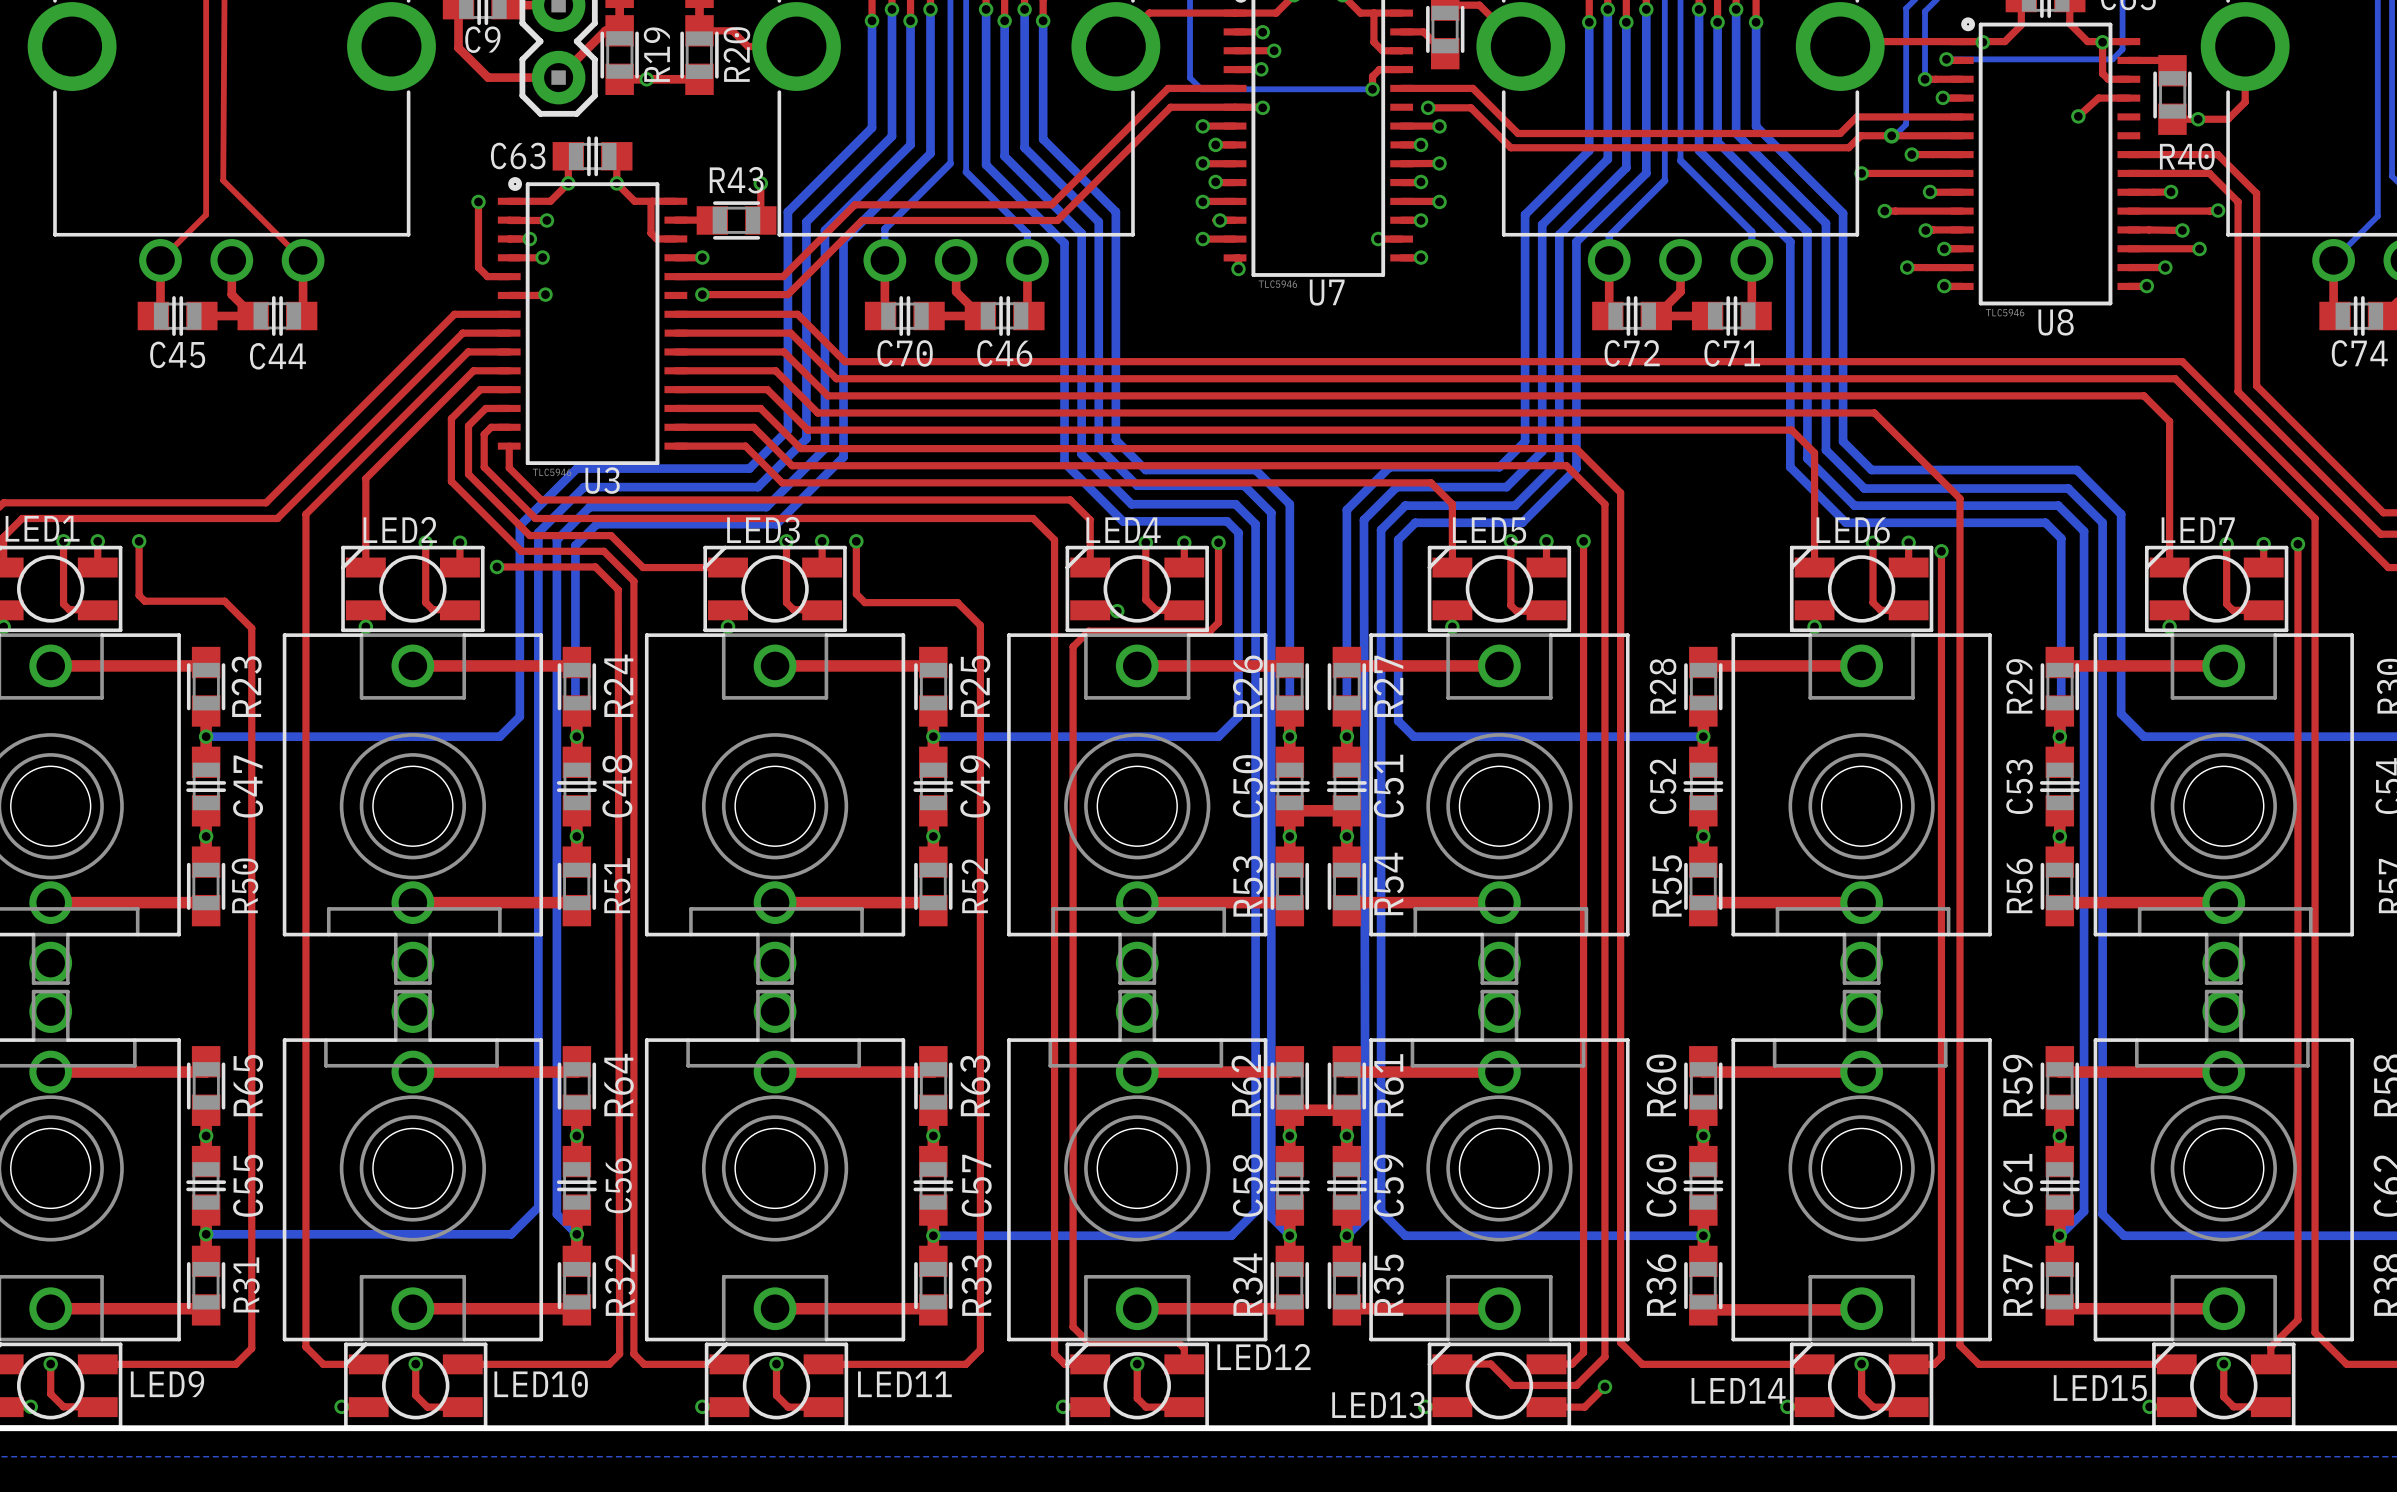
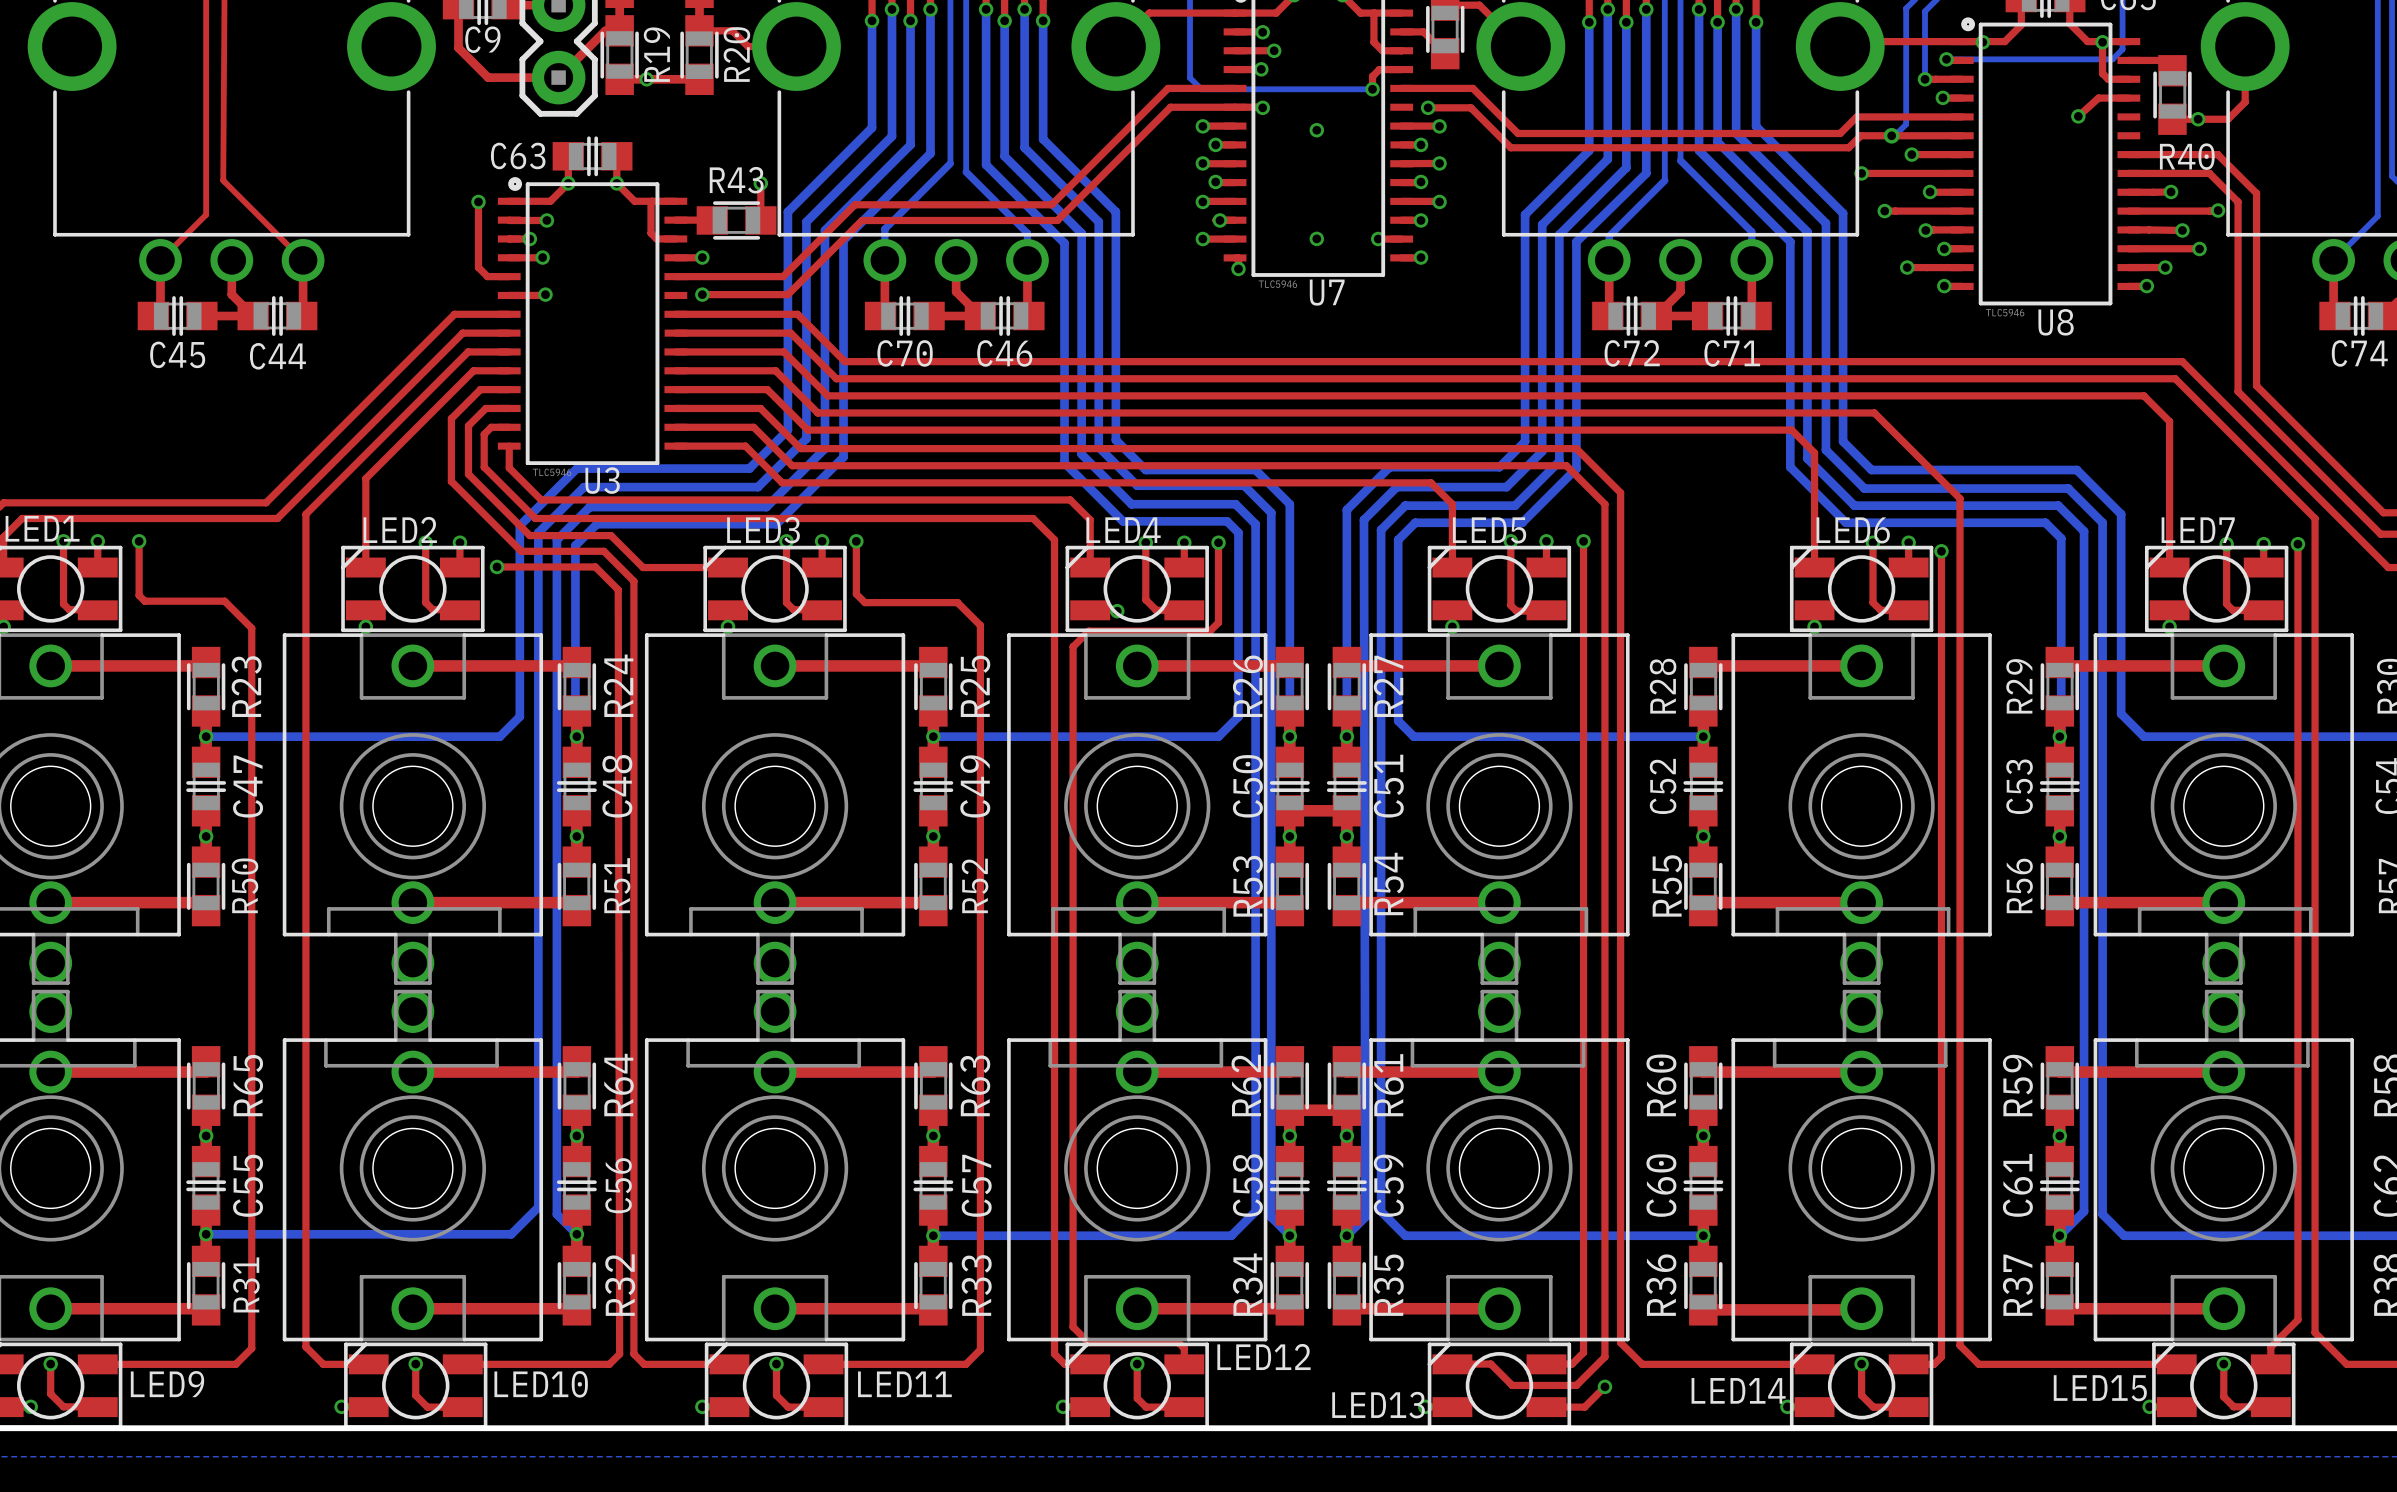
via: none -> (1316, 130)
via: none -> (1316, 238)

